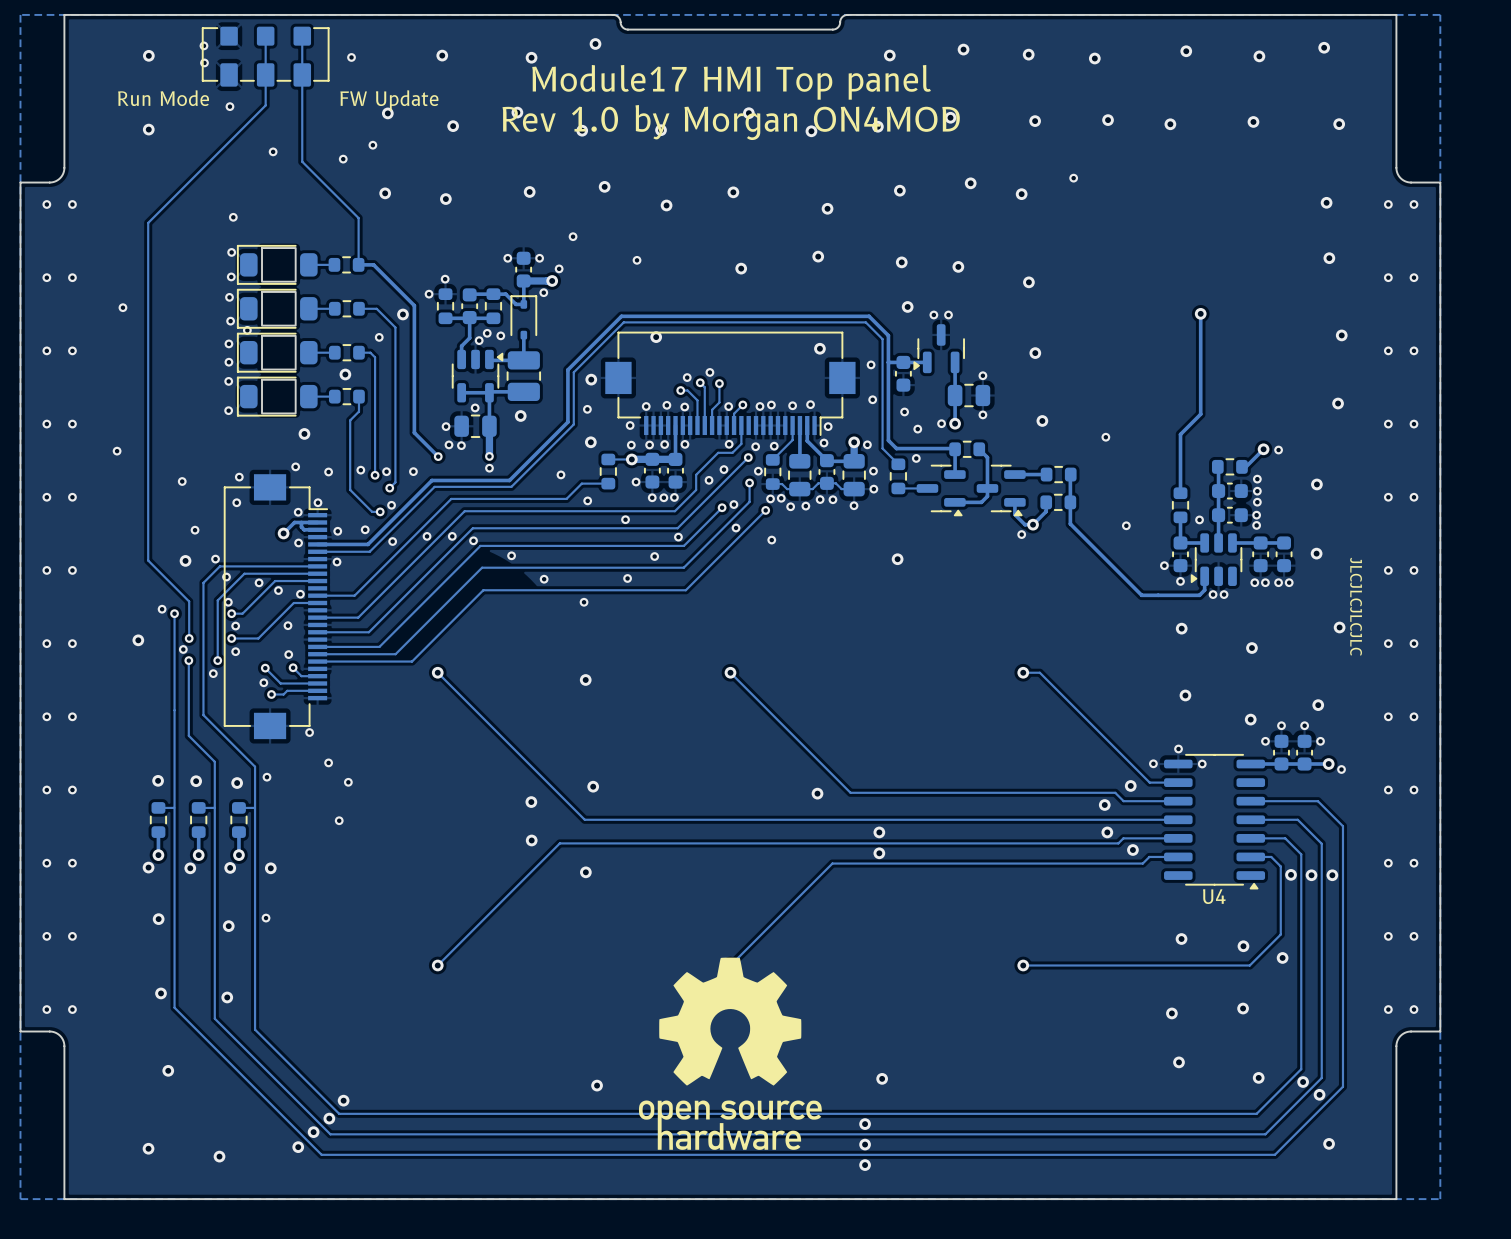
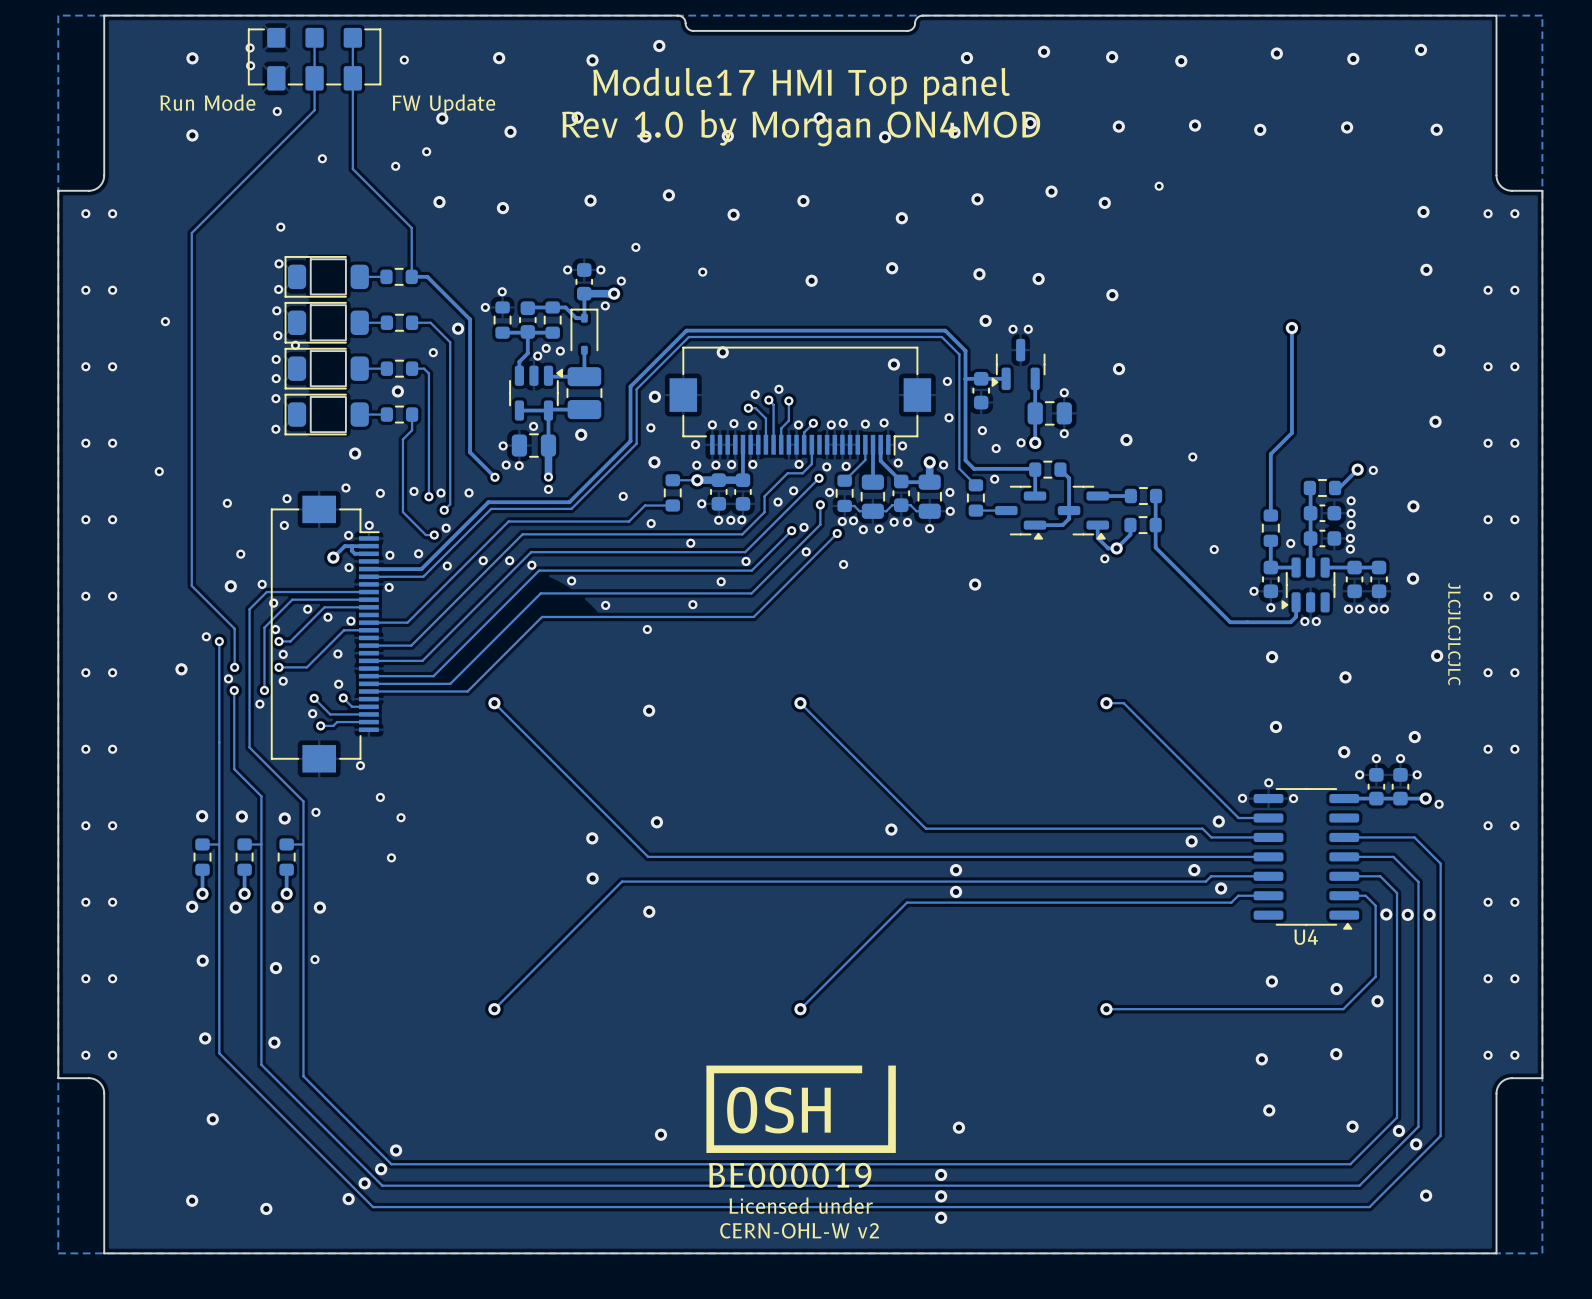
drawing shape: [638, 957, 822, 1150] -> [706, 1065, 896, 1188]
text: none -> Licensed under (801, 1205)
text: none -> CERN-OHL-W v2 (799, 1230)

